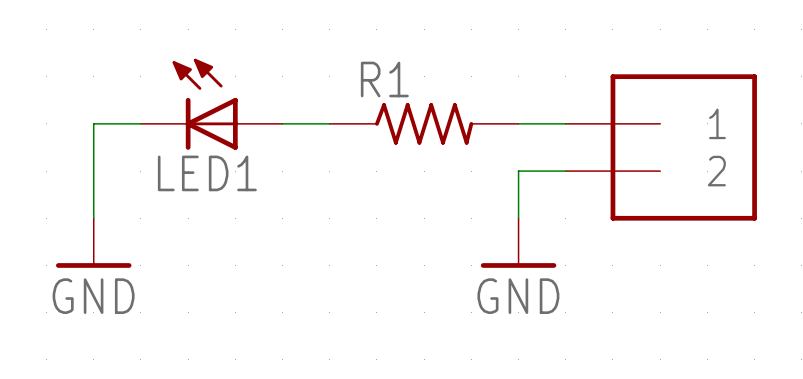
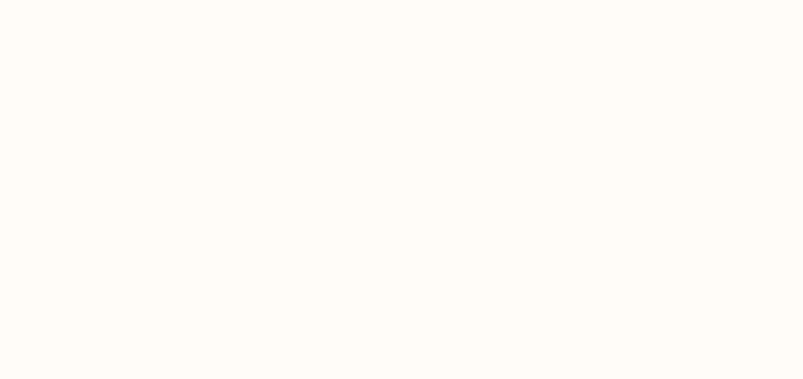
LED1: (211, 104) -> none
wire: (140, 123) (93, 123) (93, 218) -> none
wire: (282, 123) (329, 123) -> none
R1: (424, 123) -> none
wire: (518, 123) (565, 123) -> none
part: (661, 147) -> none
wire: (565, 171) (518, 171) (518, 218) -> none
power symbol: GND (93, 243) -> none
power symbol: GND (518, 243) -> none

